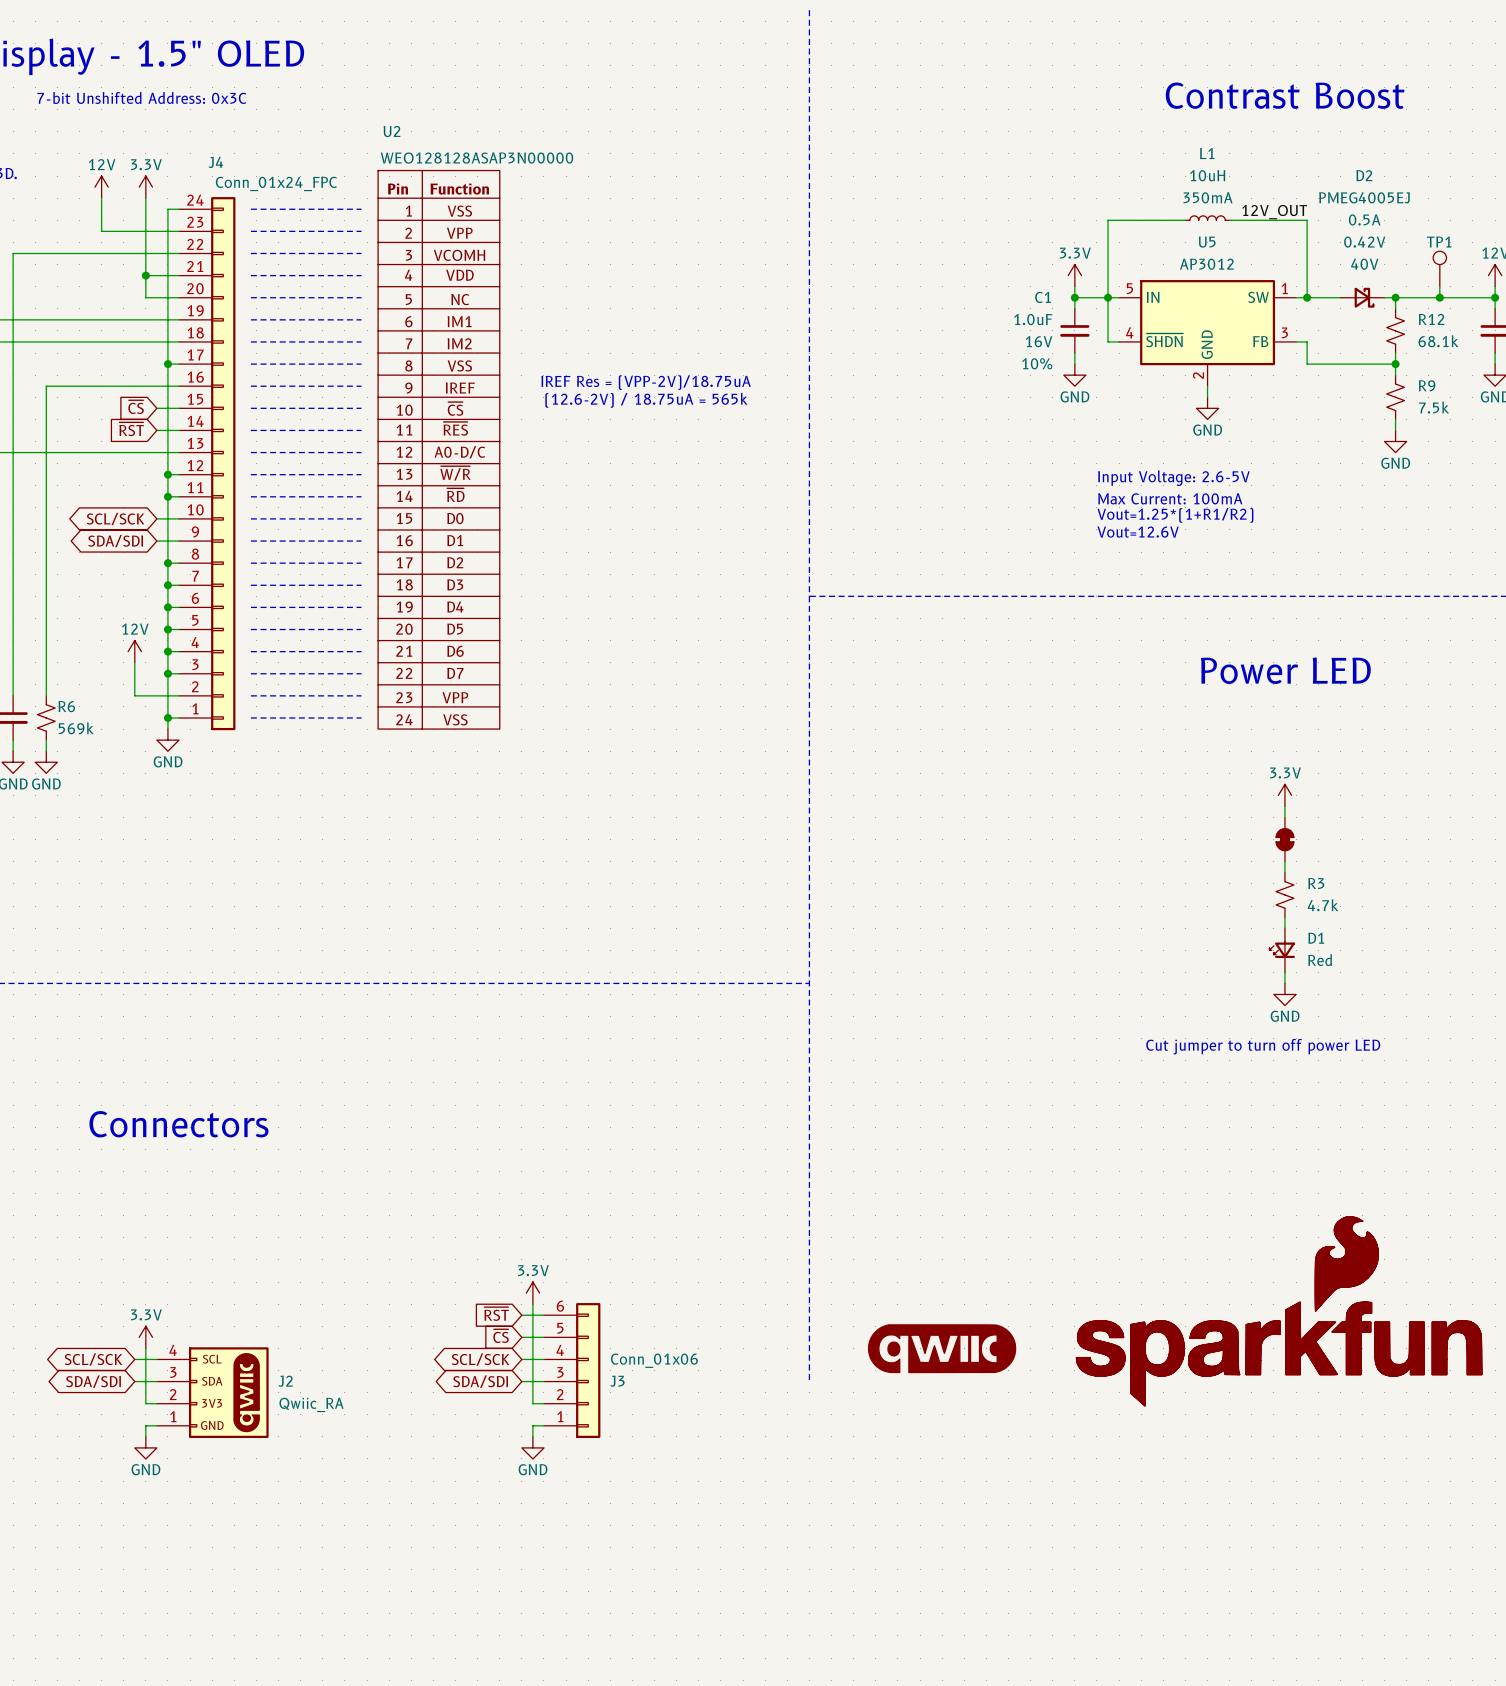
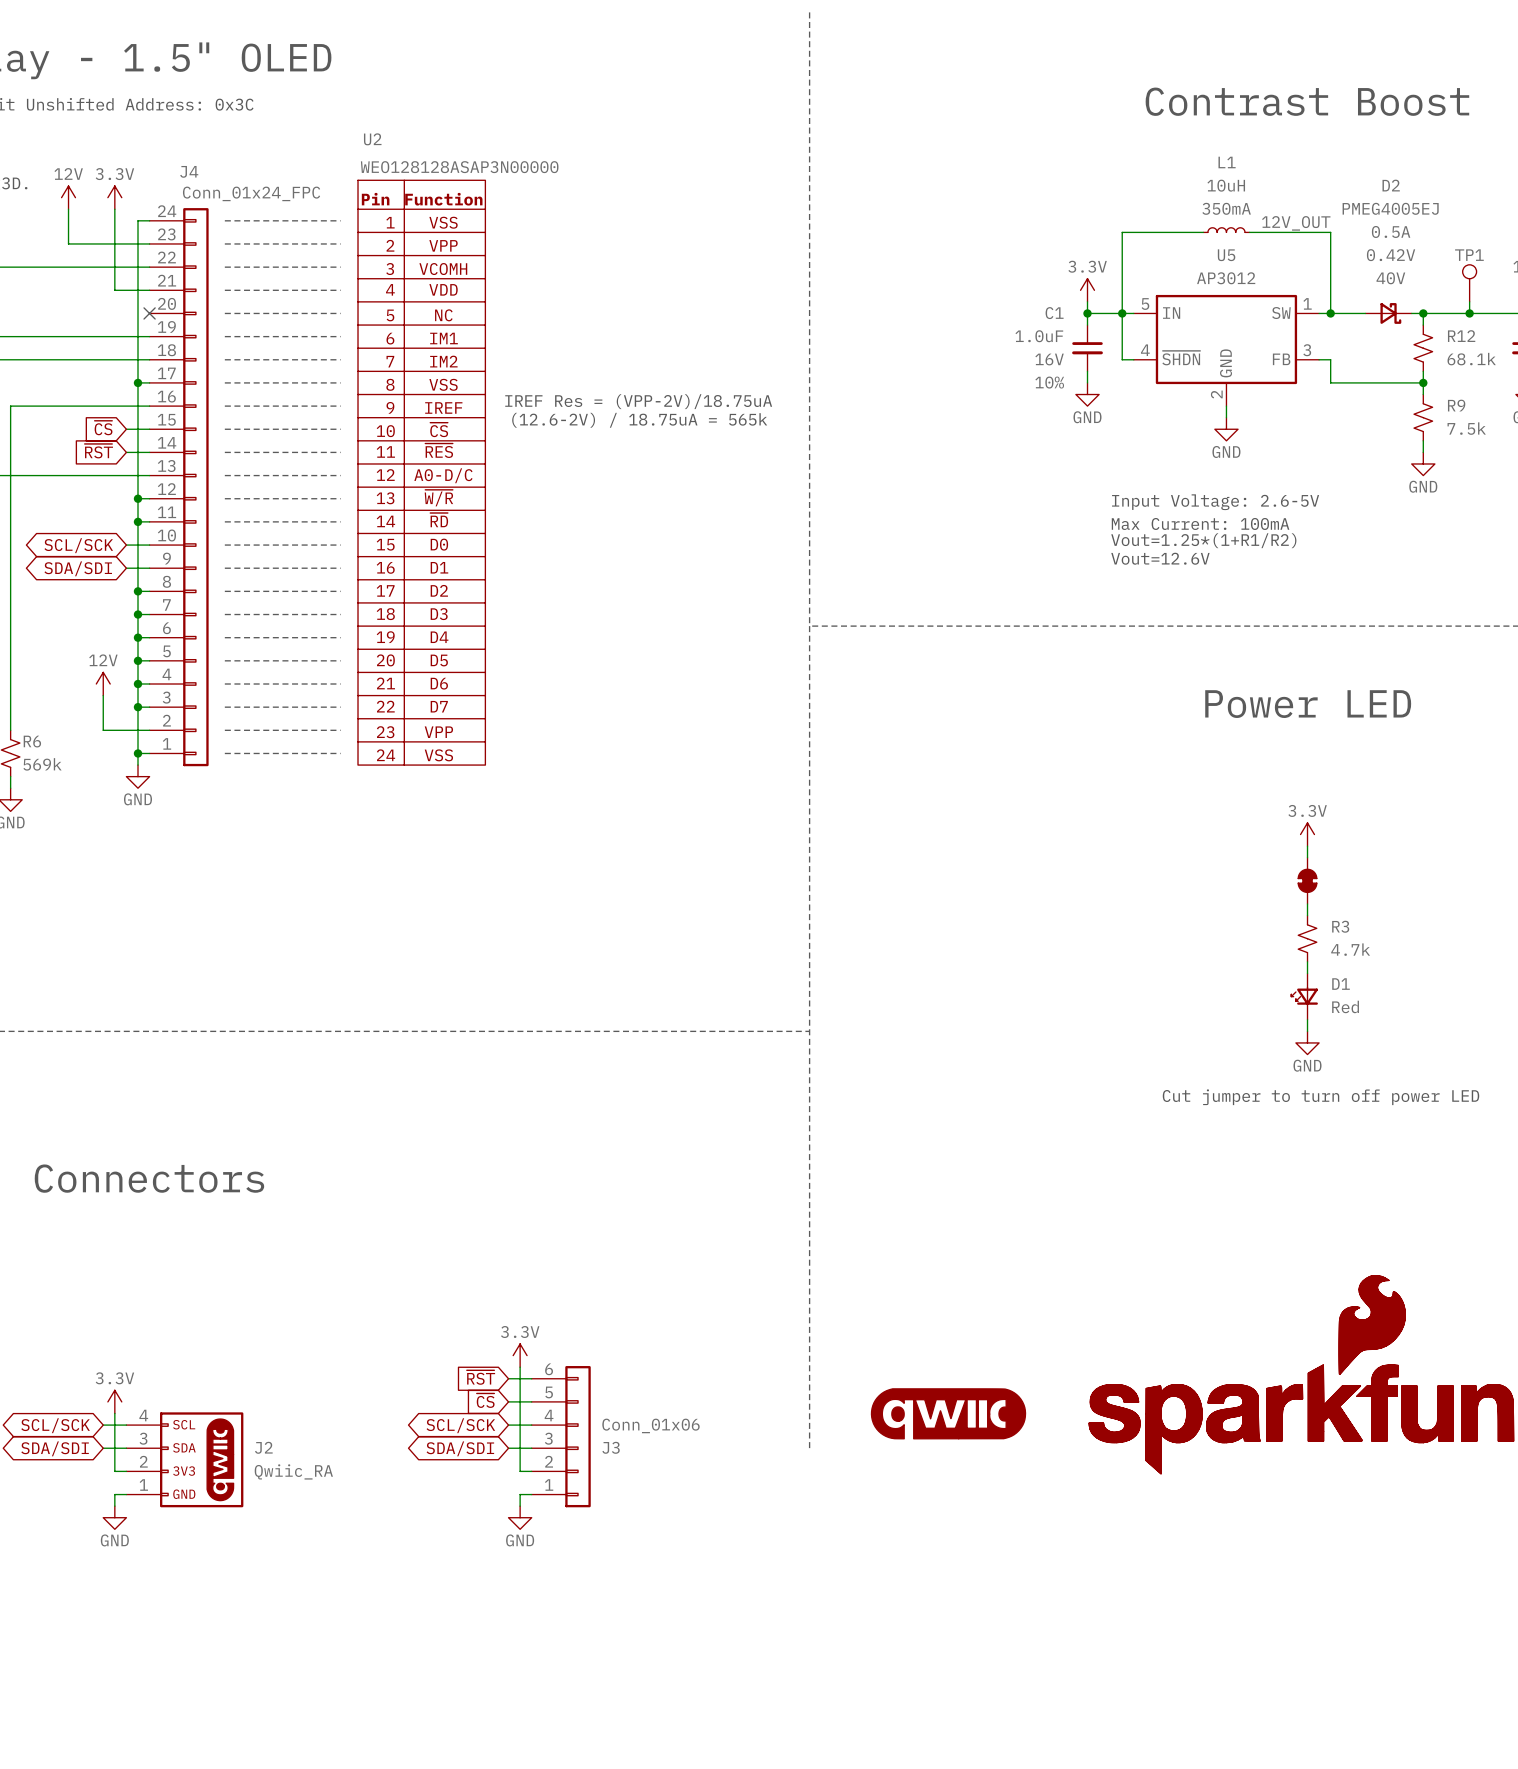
wire: (145, 275) (145, 297) (179, 297) -> none
junction: (145, 275) -> none
no-connect mark: none -> (149, 313)

